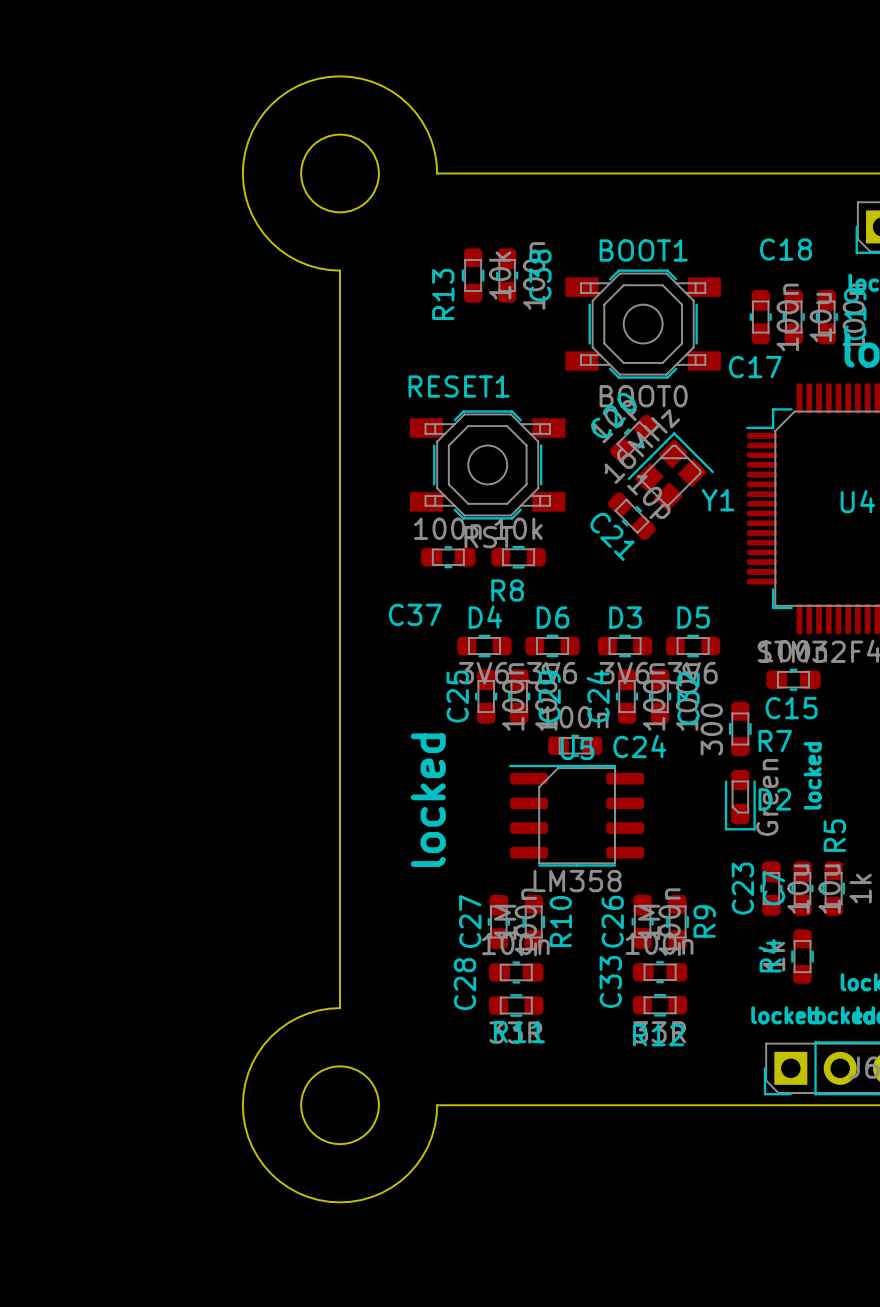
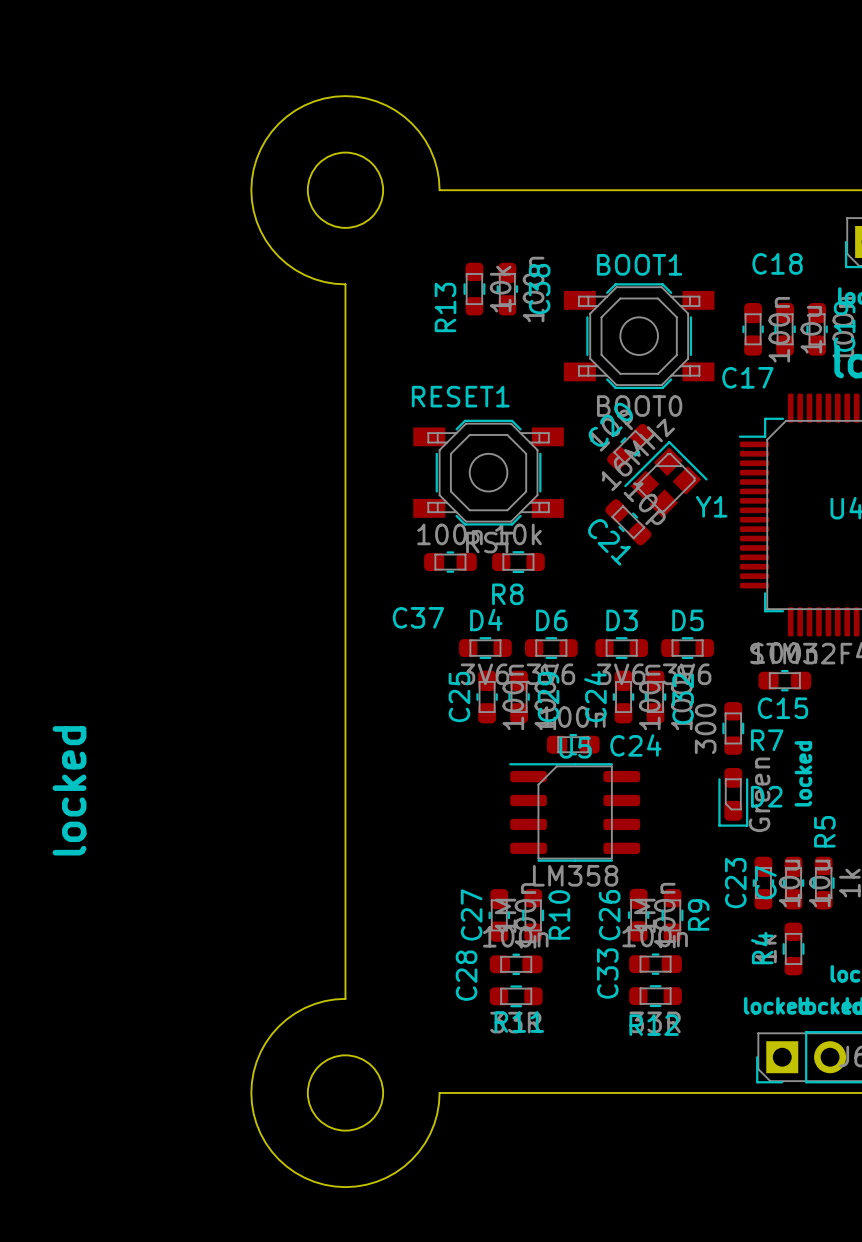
text position: locked (428, 800) -> locked (69, 790)

